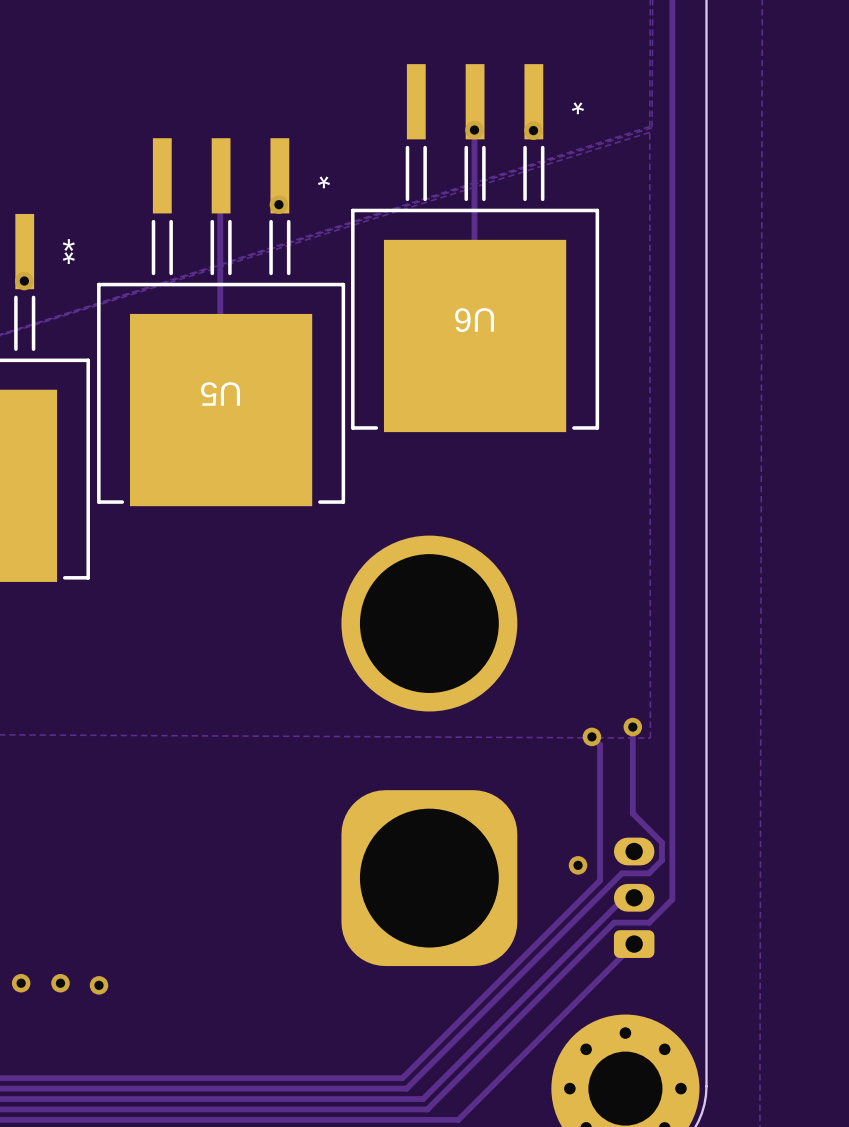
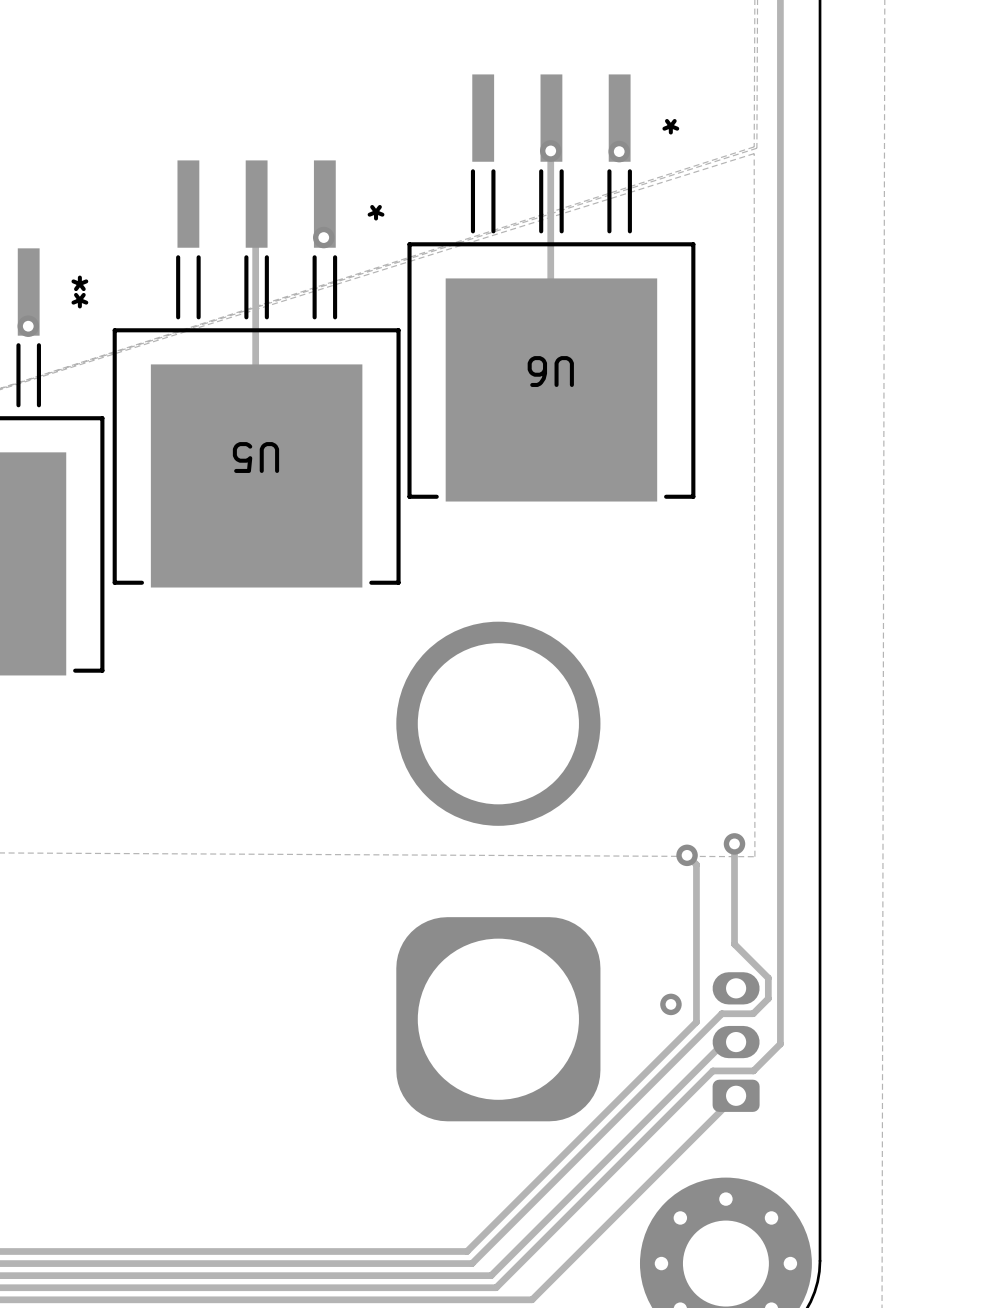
via: (21, 983) -> none
via: (60, 983) -> none
via: (99, 985) -> none

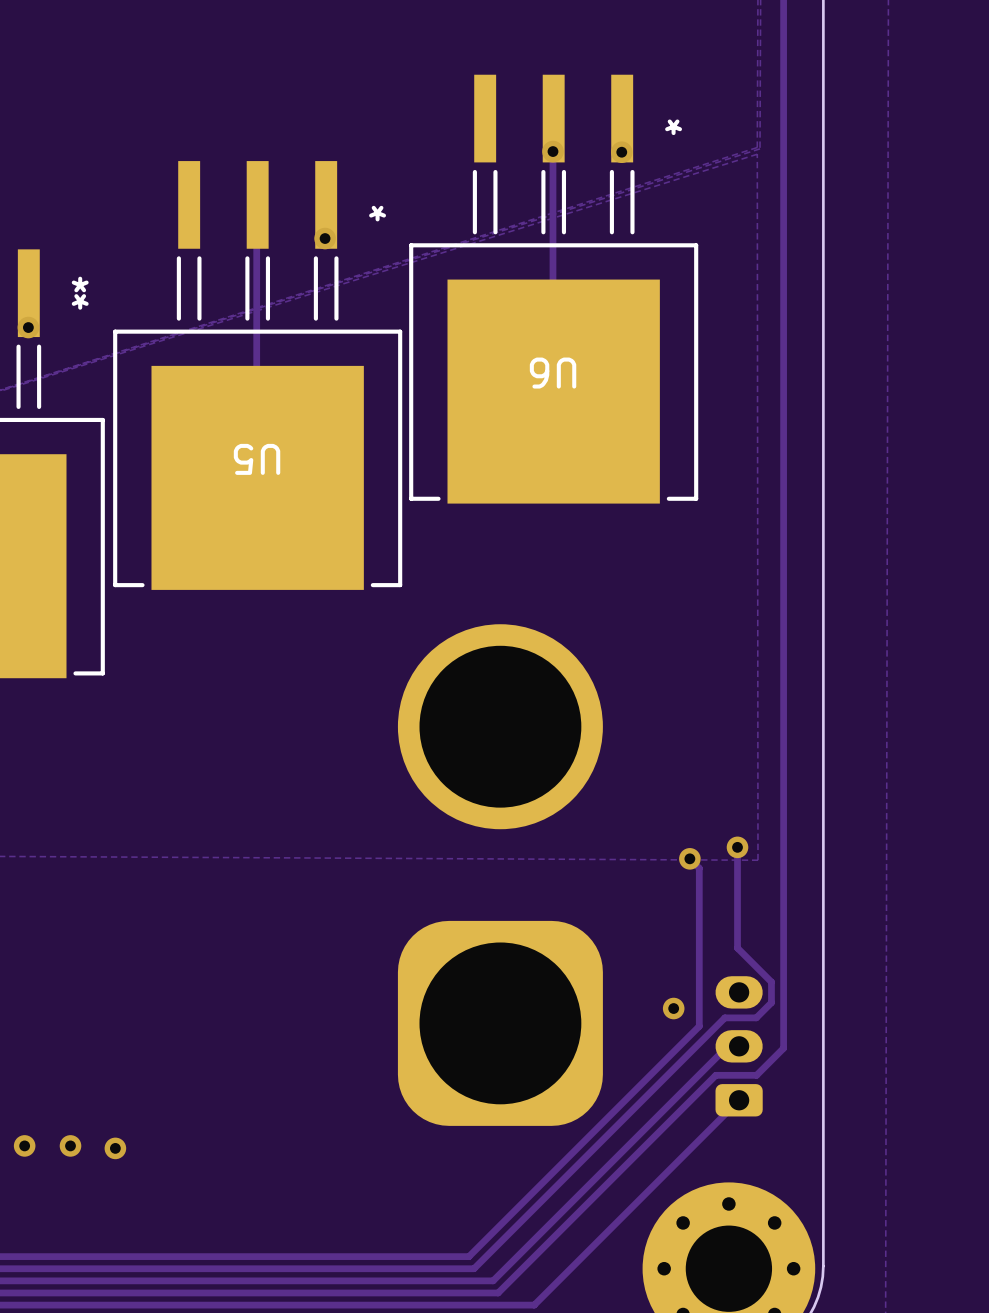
via: none -> (24, 1145)
via: none -> (70, 1145)
via: none -> (115, 1148)

